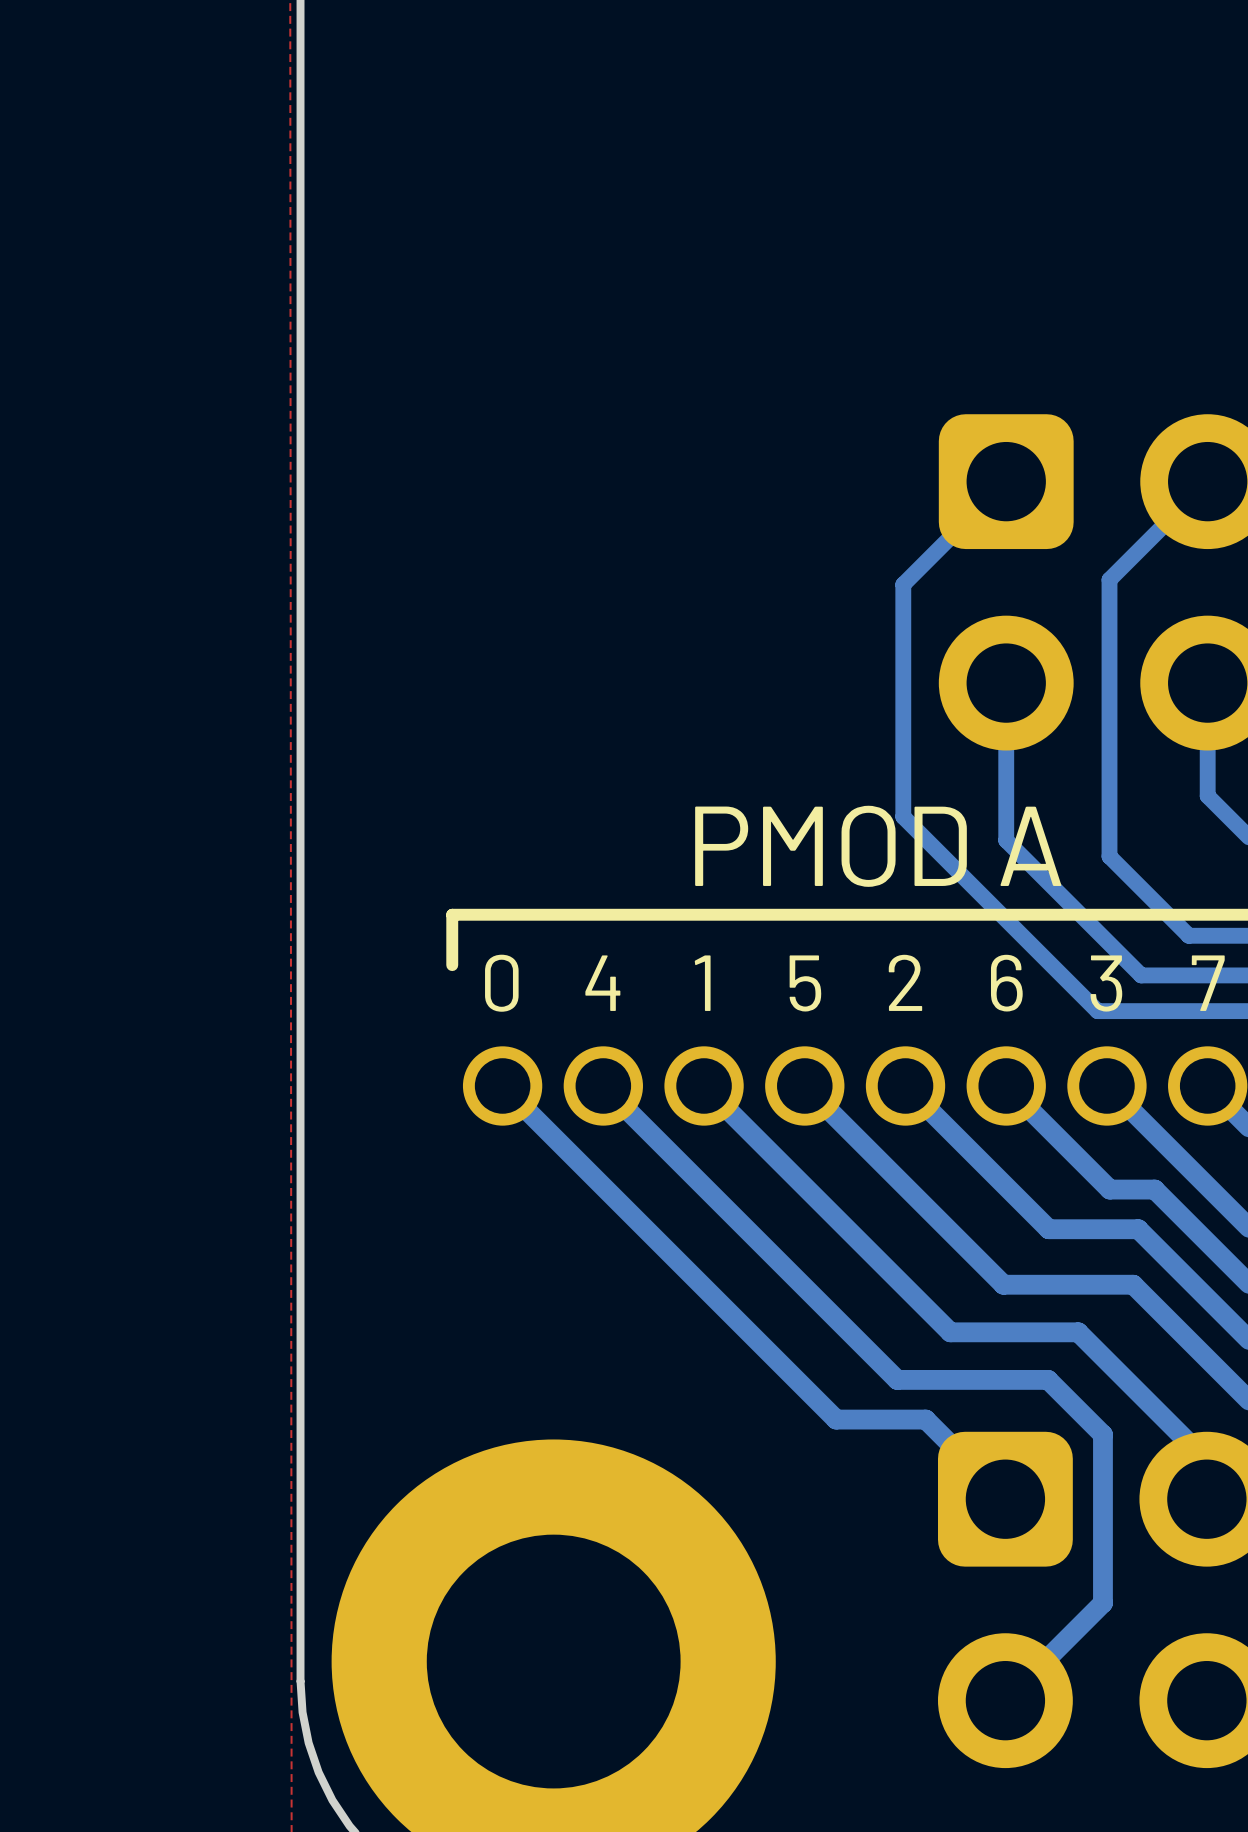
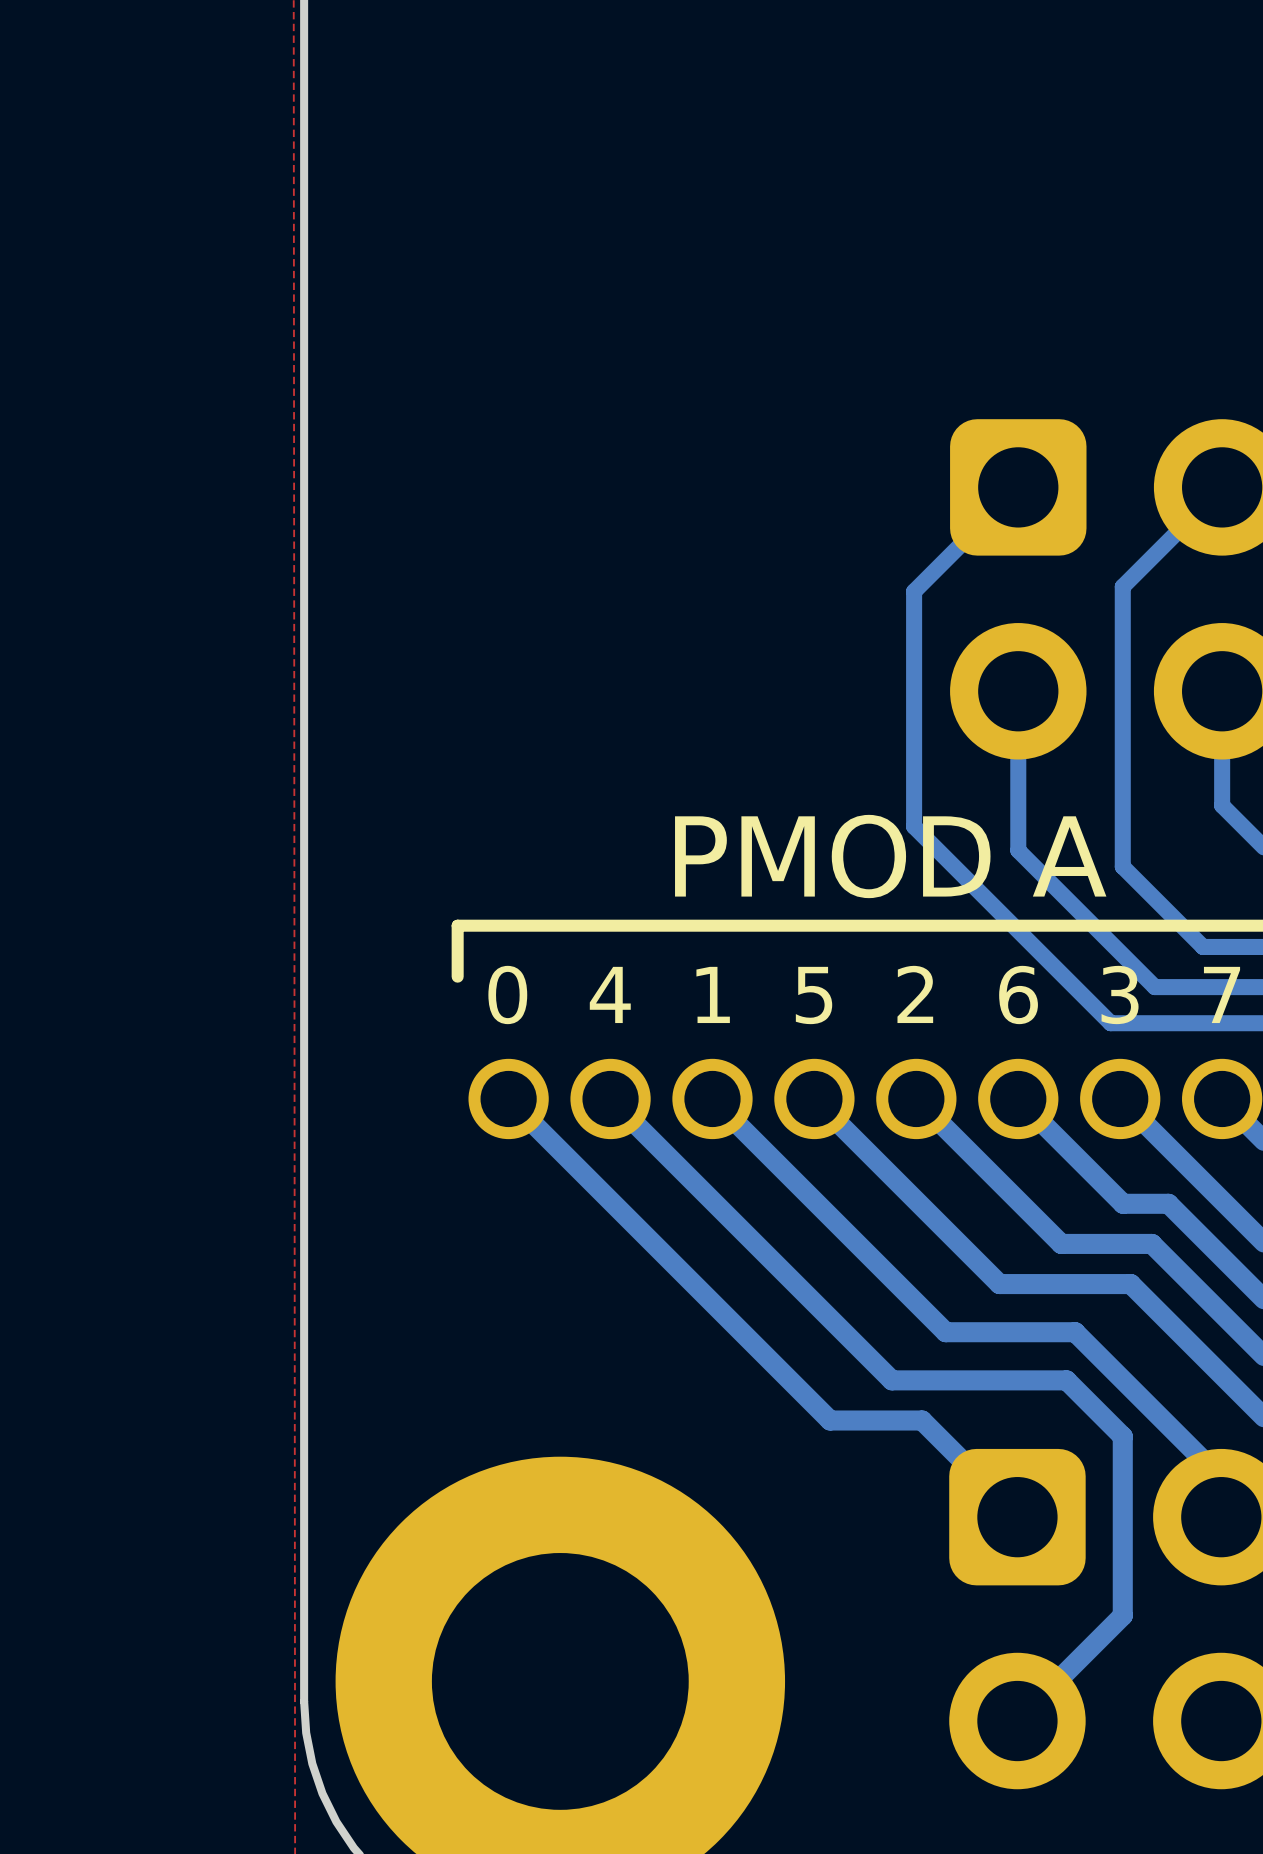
bottom track: (987, 1268) (1003, 1284) (1133, 1284) -> (999, 1284) (1130, 1284) (1146, 1300)
bottom track: (934, 1316) (950, 1332) (1078, 1332) -> (945, 1332) (1075, 1332) (1091, 1348)
bottom track: (881, 1364) (897, 1379) (1048, 1379) (1102, 1434) (1102, 1603) -> (891, 1380) (1066, 1380) (1122, 1436) (1122, 1615) (1116, 1622)
bottom track: (820, 1403) (836, 1419) (925, 1419) (1005, 1499) -> (830, 1420) (922, 1420) (1017, 1515)

